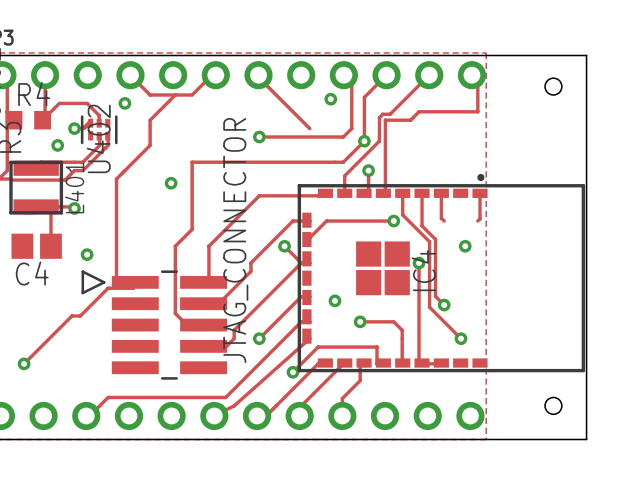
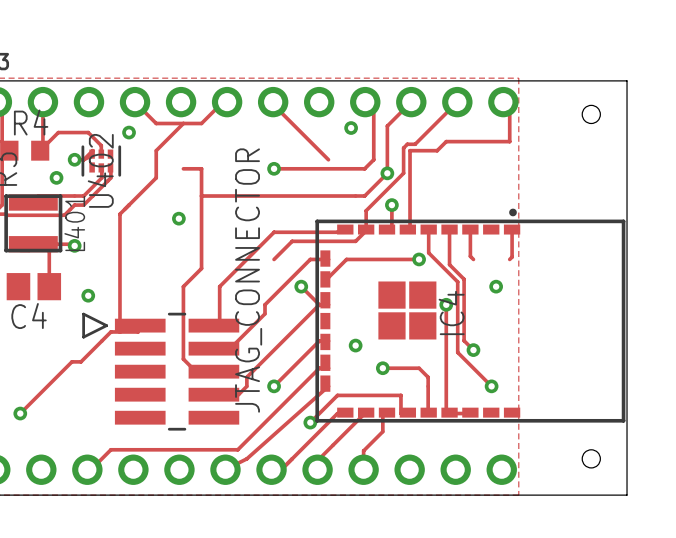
track: none -> (183, 168) (201, 168) (201, 196)
track: none -> (364, 232) (355, 241) (292, 241) (274, 259)

